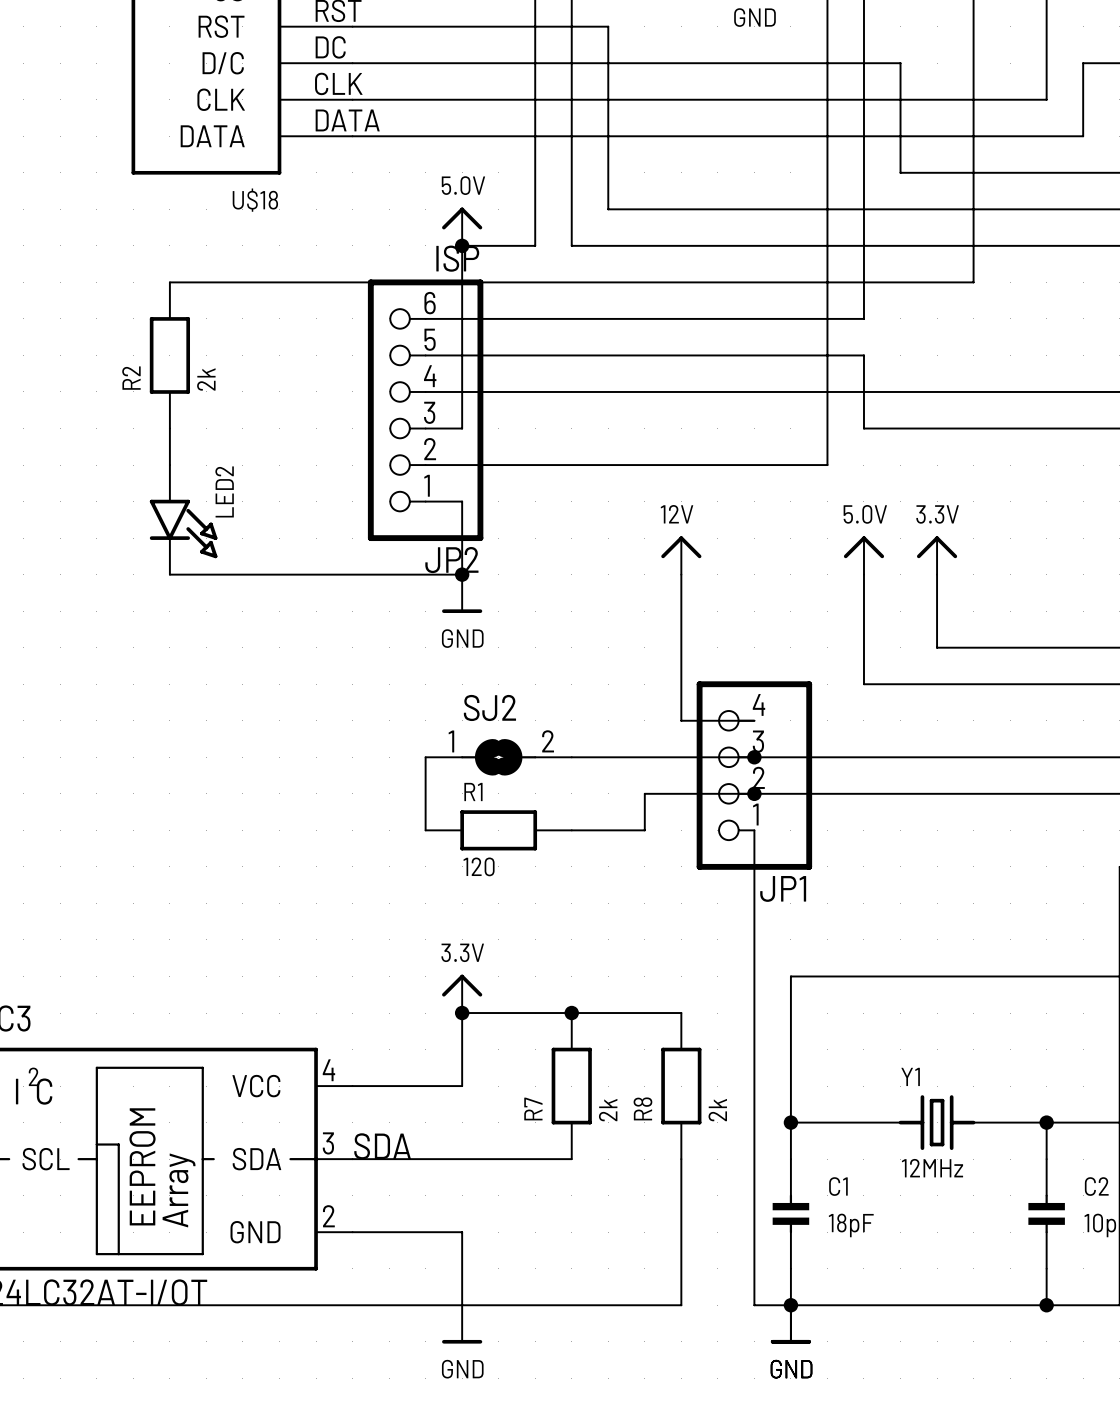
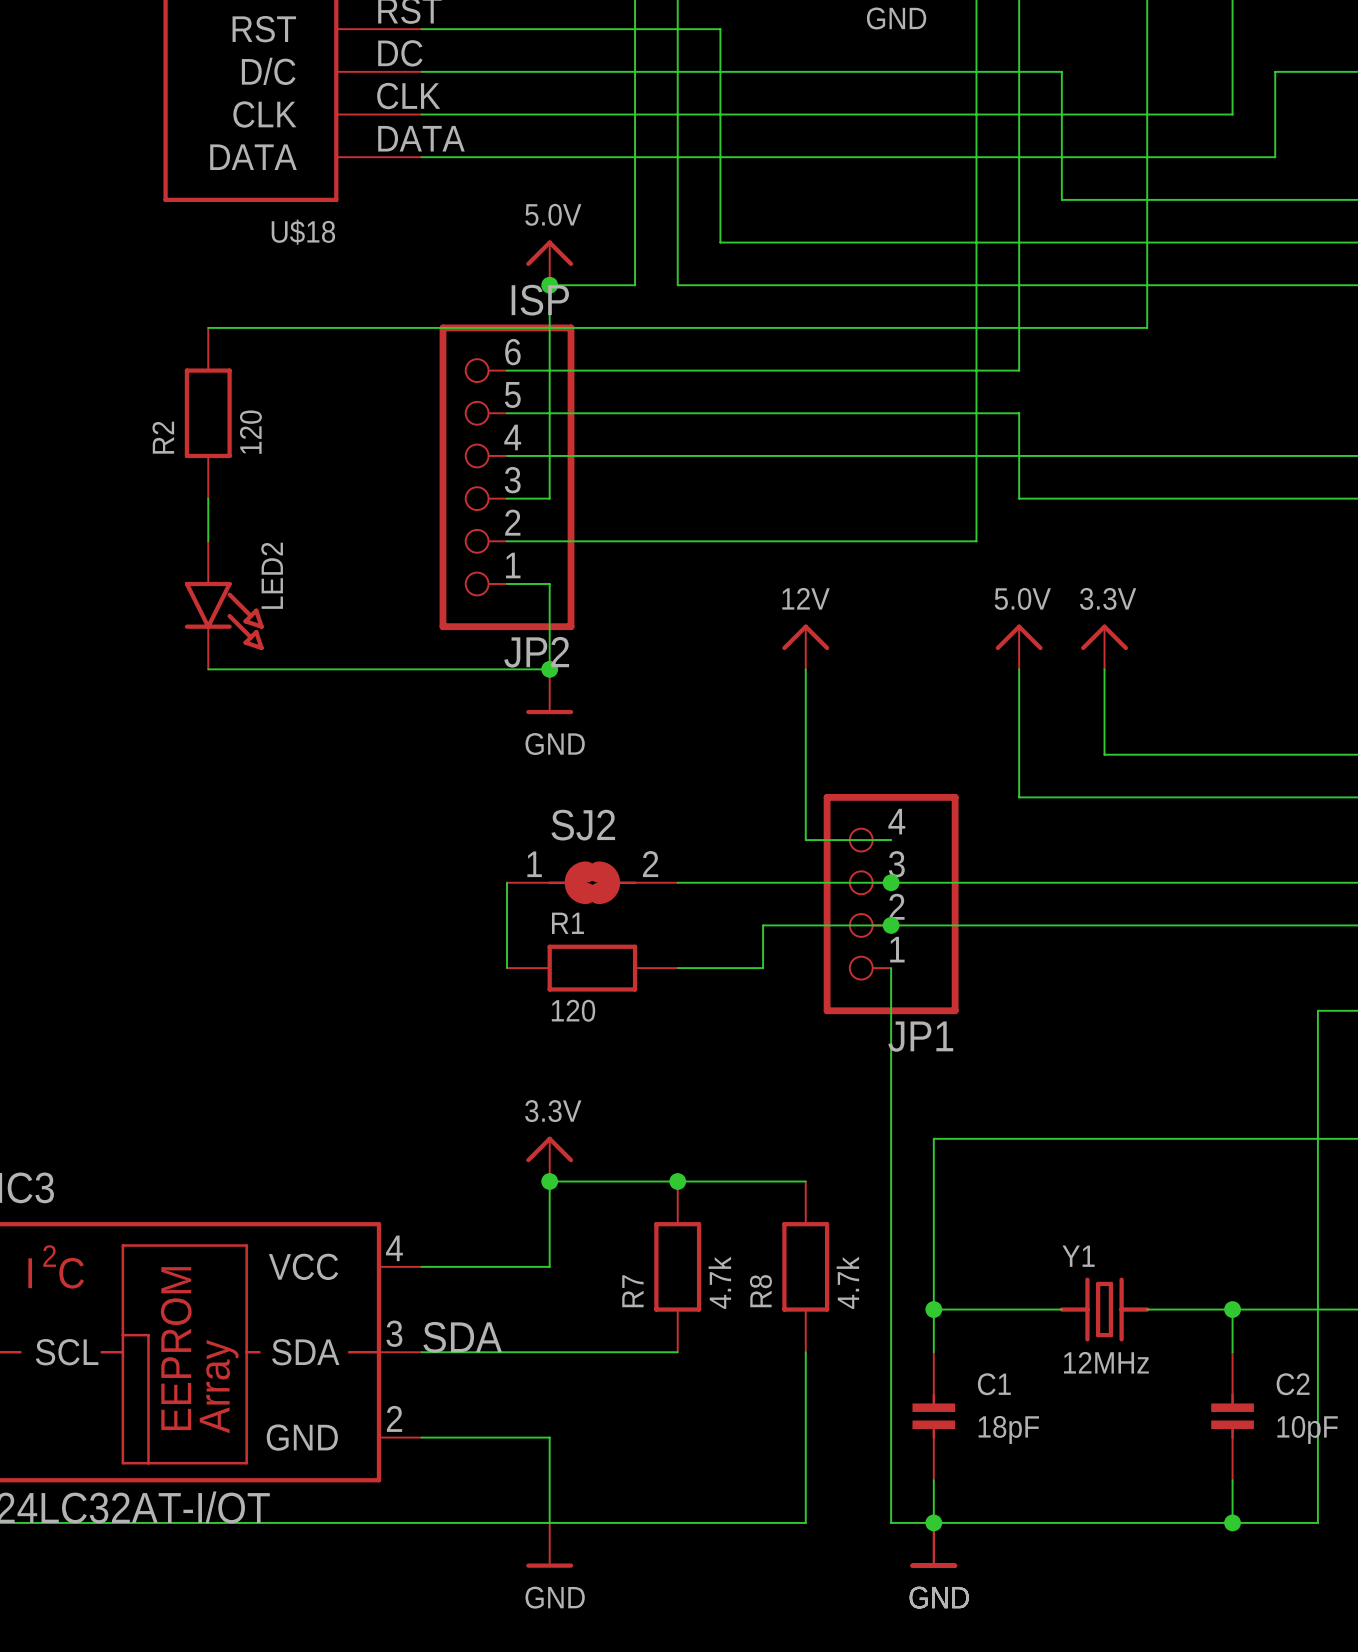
R2 value: 2k (206, 379) -> 120 (250, 432)
R7 value: 2k (608, 1110) -> 4.7k (719, 1282)
R8 value: 2k (717, 1110) -> 4.7k (847, 1282)

